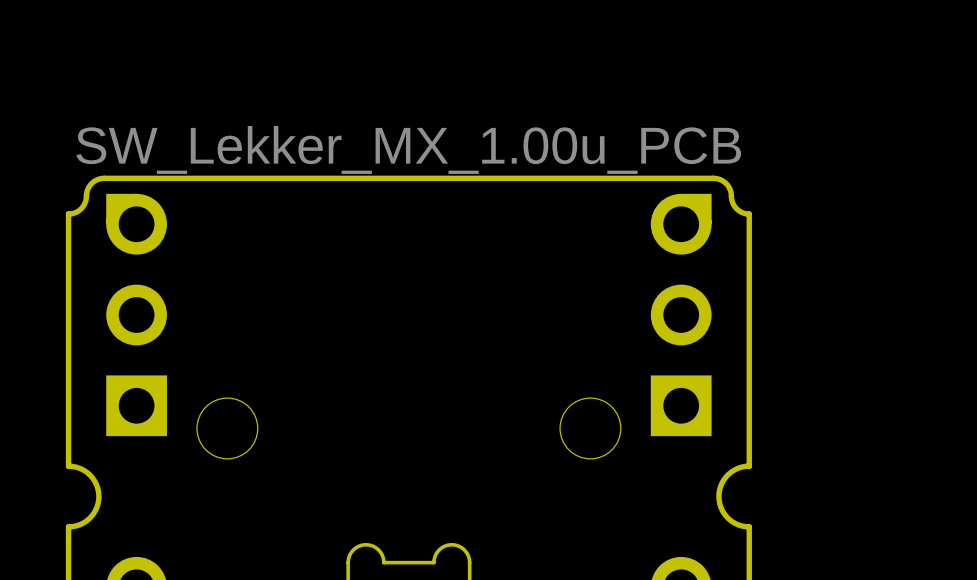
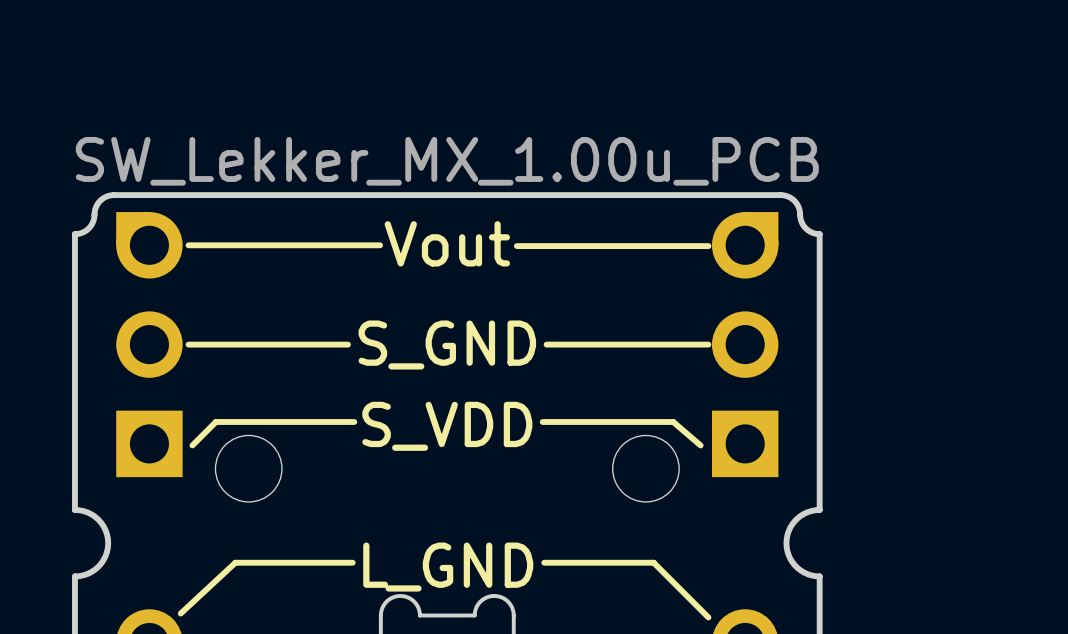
text: none -> Vout (447, 243)
line: none -> (188, 245) (380, 245)
line: none -> (516, 246) (708, 246)
line: none -> (188, 344) (348, 344)
line: none -> (546, 344) (708, 344)
text: none -> S_GND (447, 345)
line: none -> (354, 422) (215, 422) (192, 445)
line: none -> (542, 422) (673, 422) (700, 445)
text: none -> S_VDD (447, 426)
line: none -> (352, 562) (235, 562) (180, 613)
line: none -> (544, 562) (653, 562) (708, 617)
text: none -> L_GND (448, 567)

